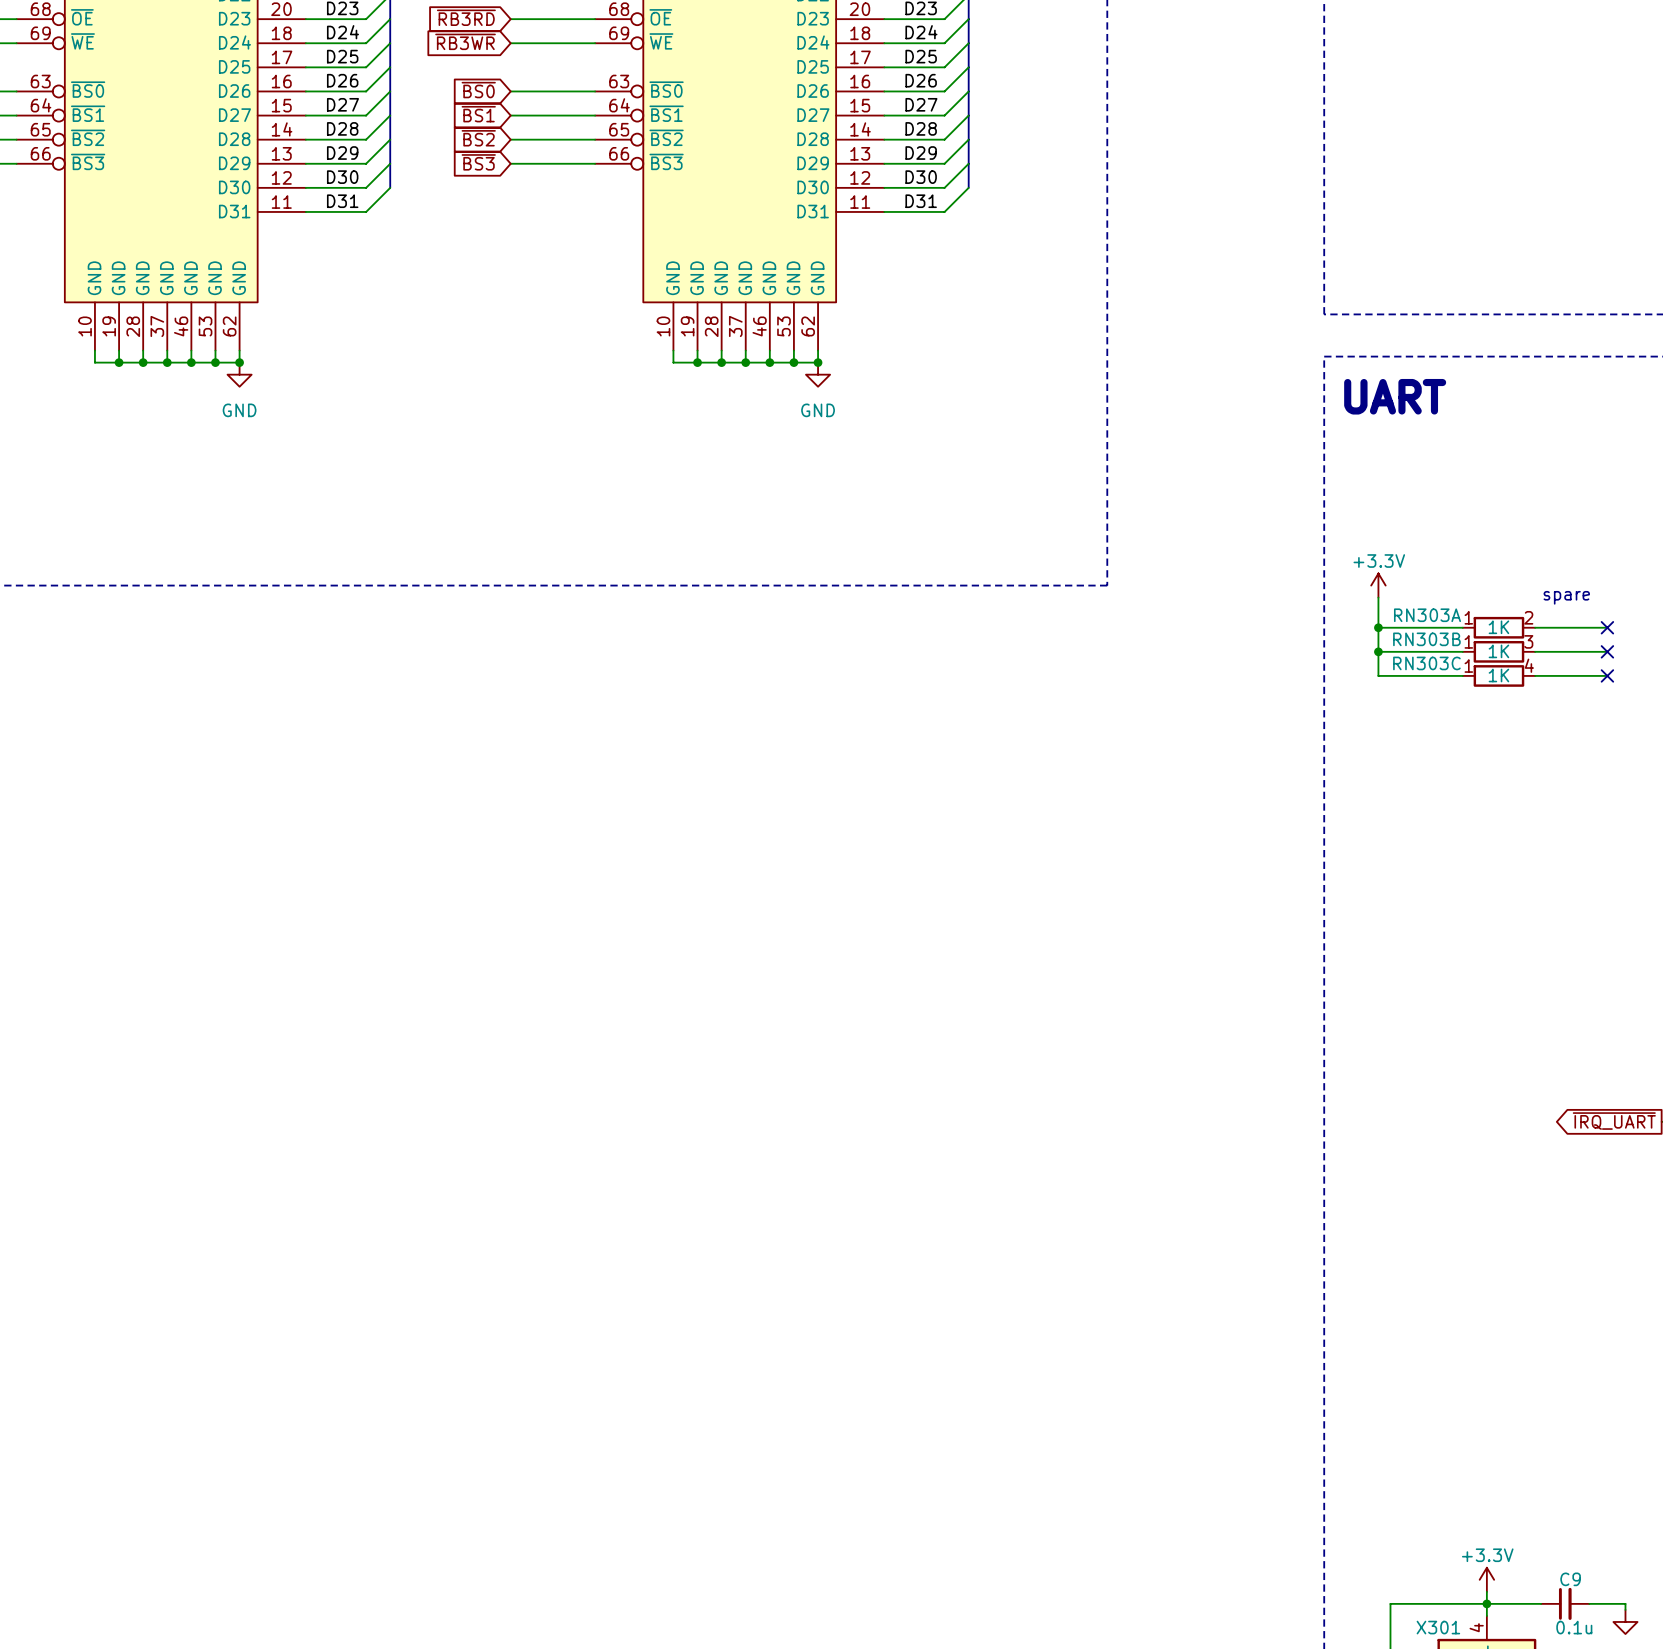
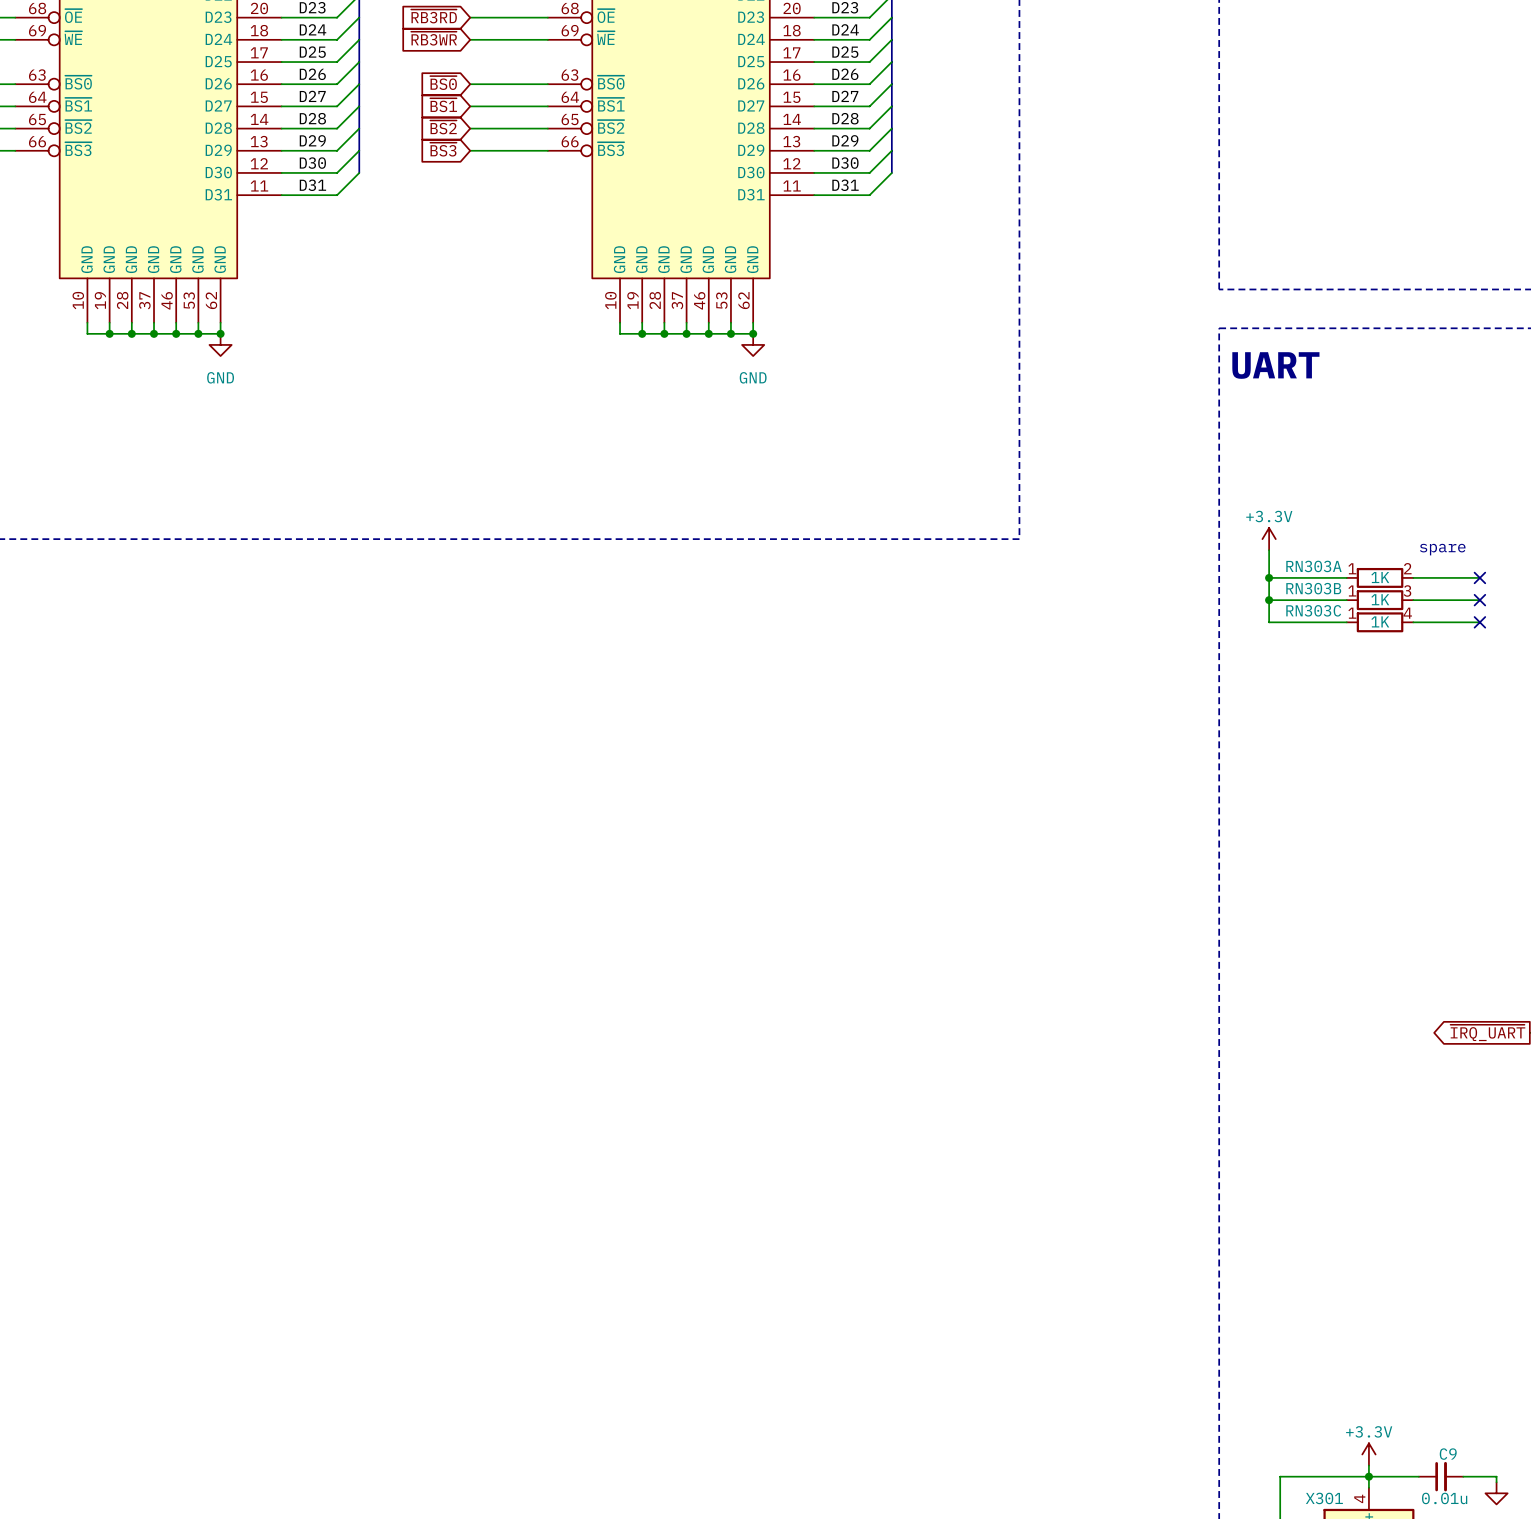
C9 value: 0.1u (1574, 1627) -> 0.01u (1444, 1498)

